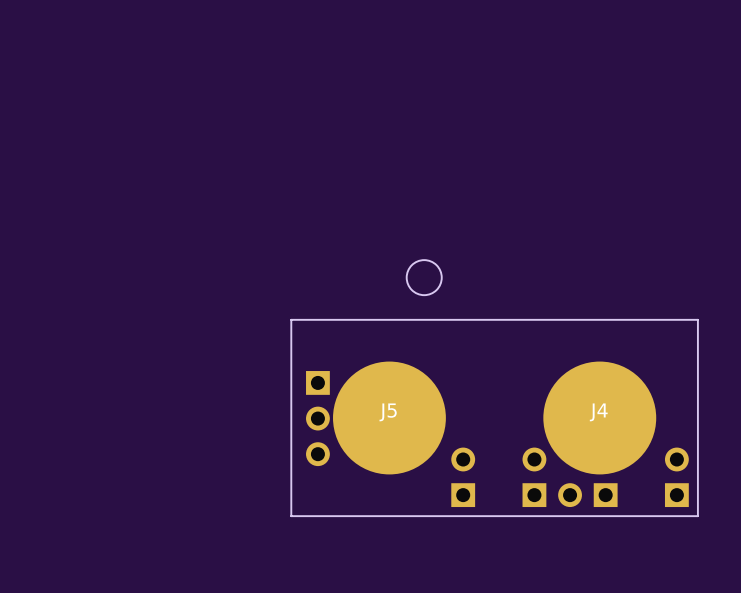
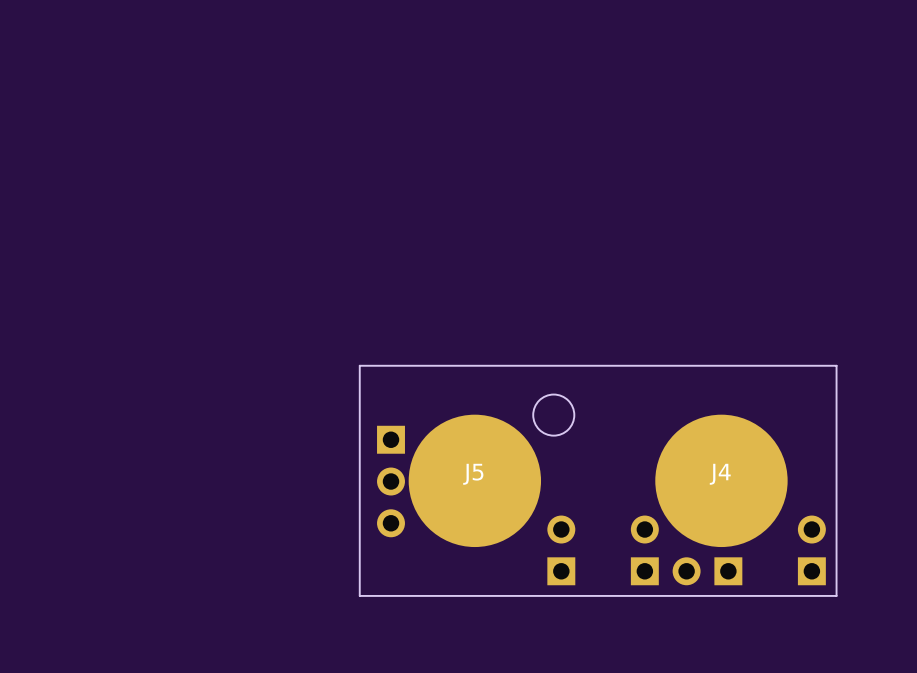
round board edge position: (424, 277) -> (553, 415)

